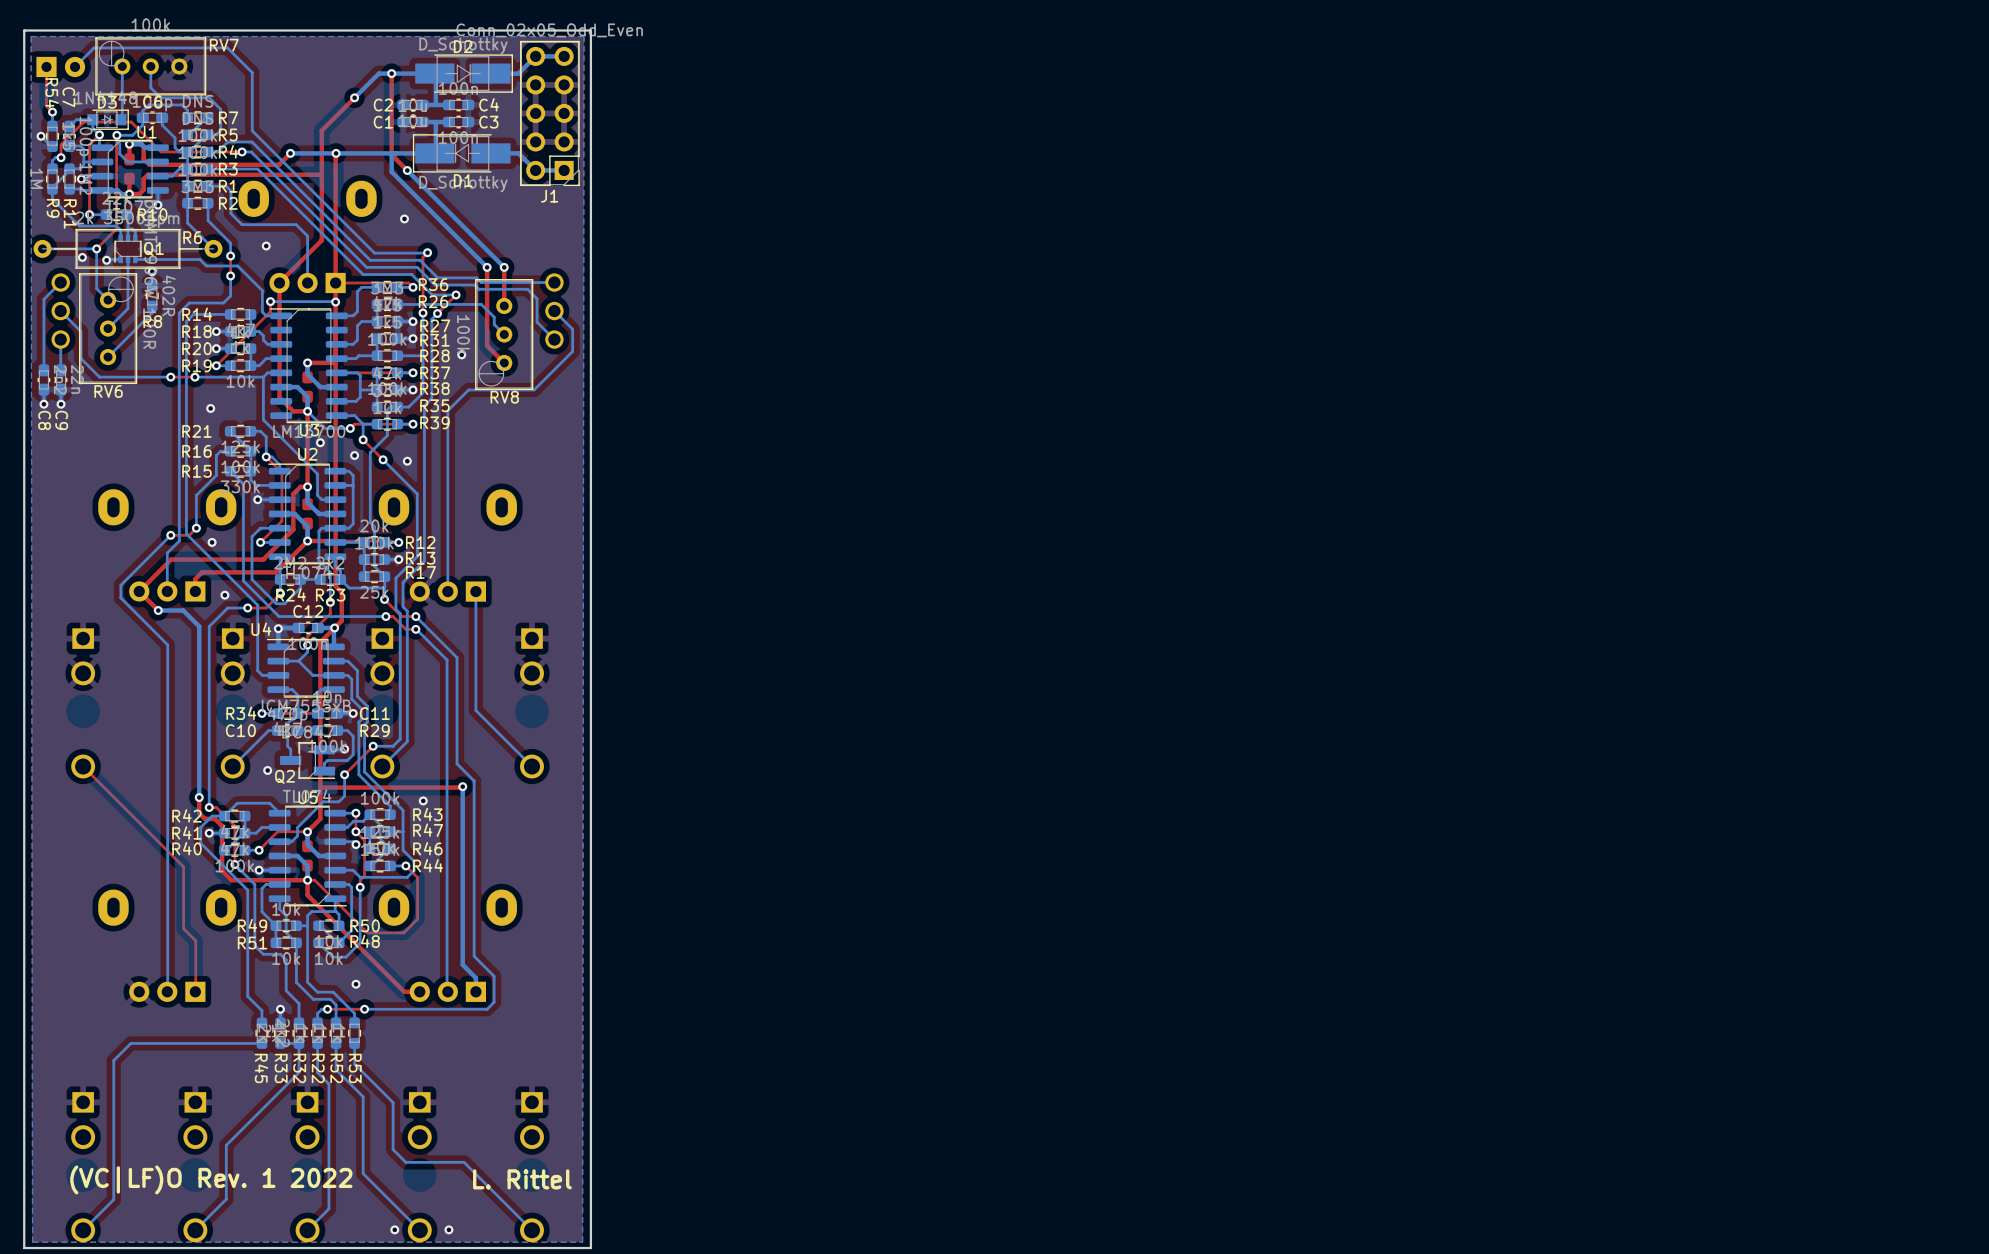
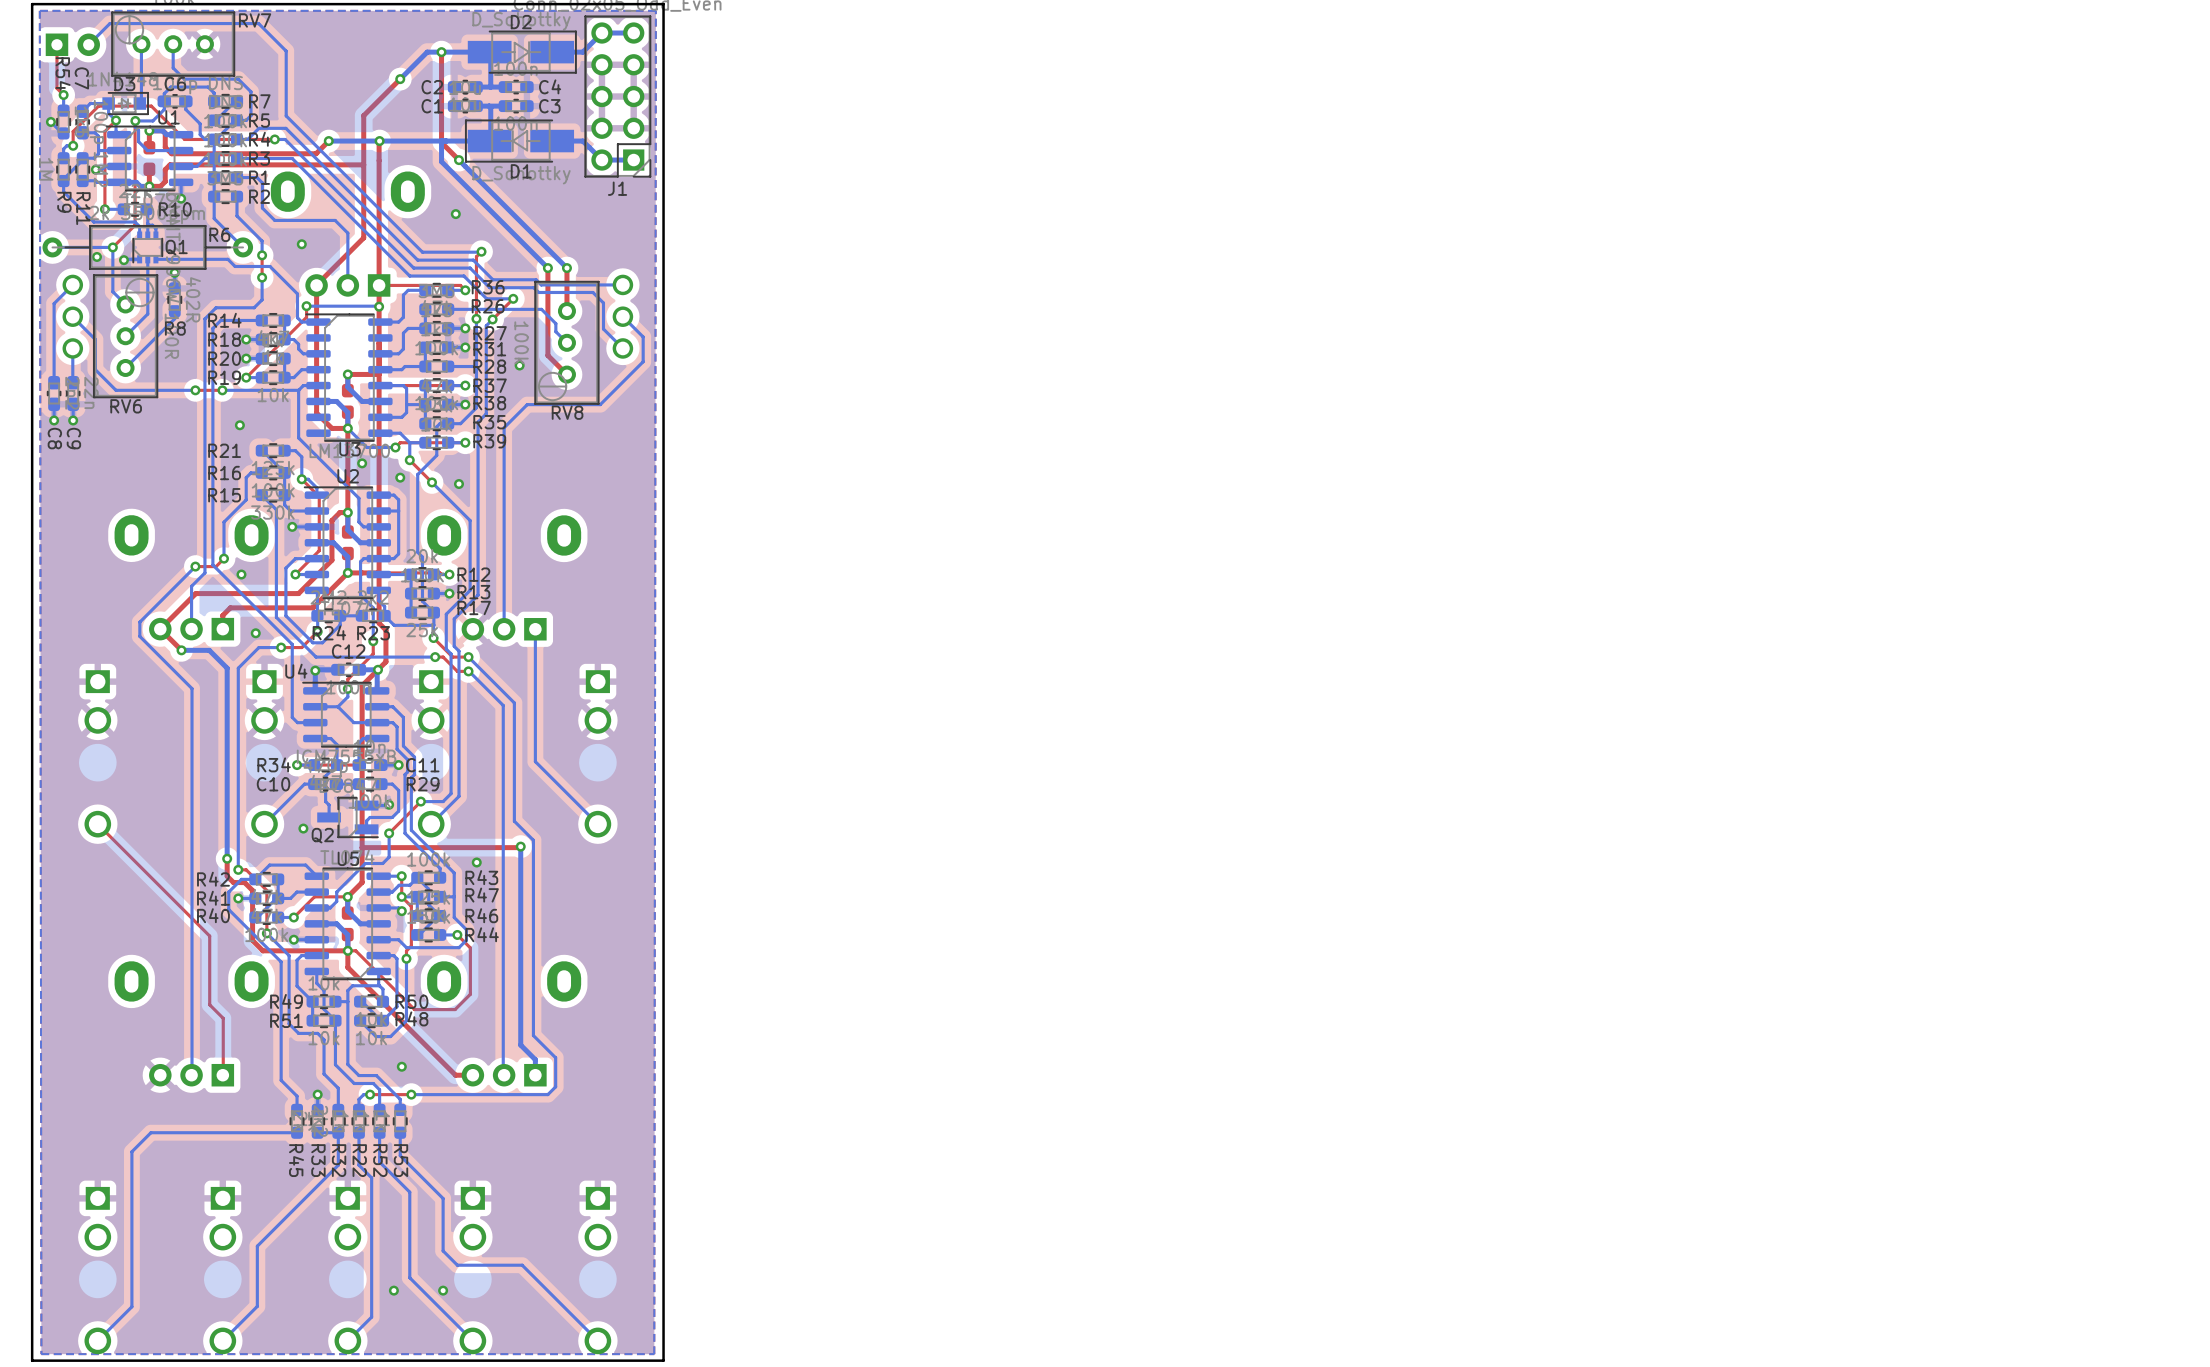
text: (VC|LF)O Rev. 1 2022 (211, 1179) -> none
text: L. Rittel (522, 1179) -> none
via: none -> (393, 1290)
via: none -> (443, 1290)
via: (394, 1229) -> none
via: (448, 1229) -> none

